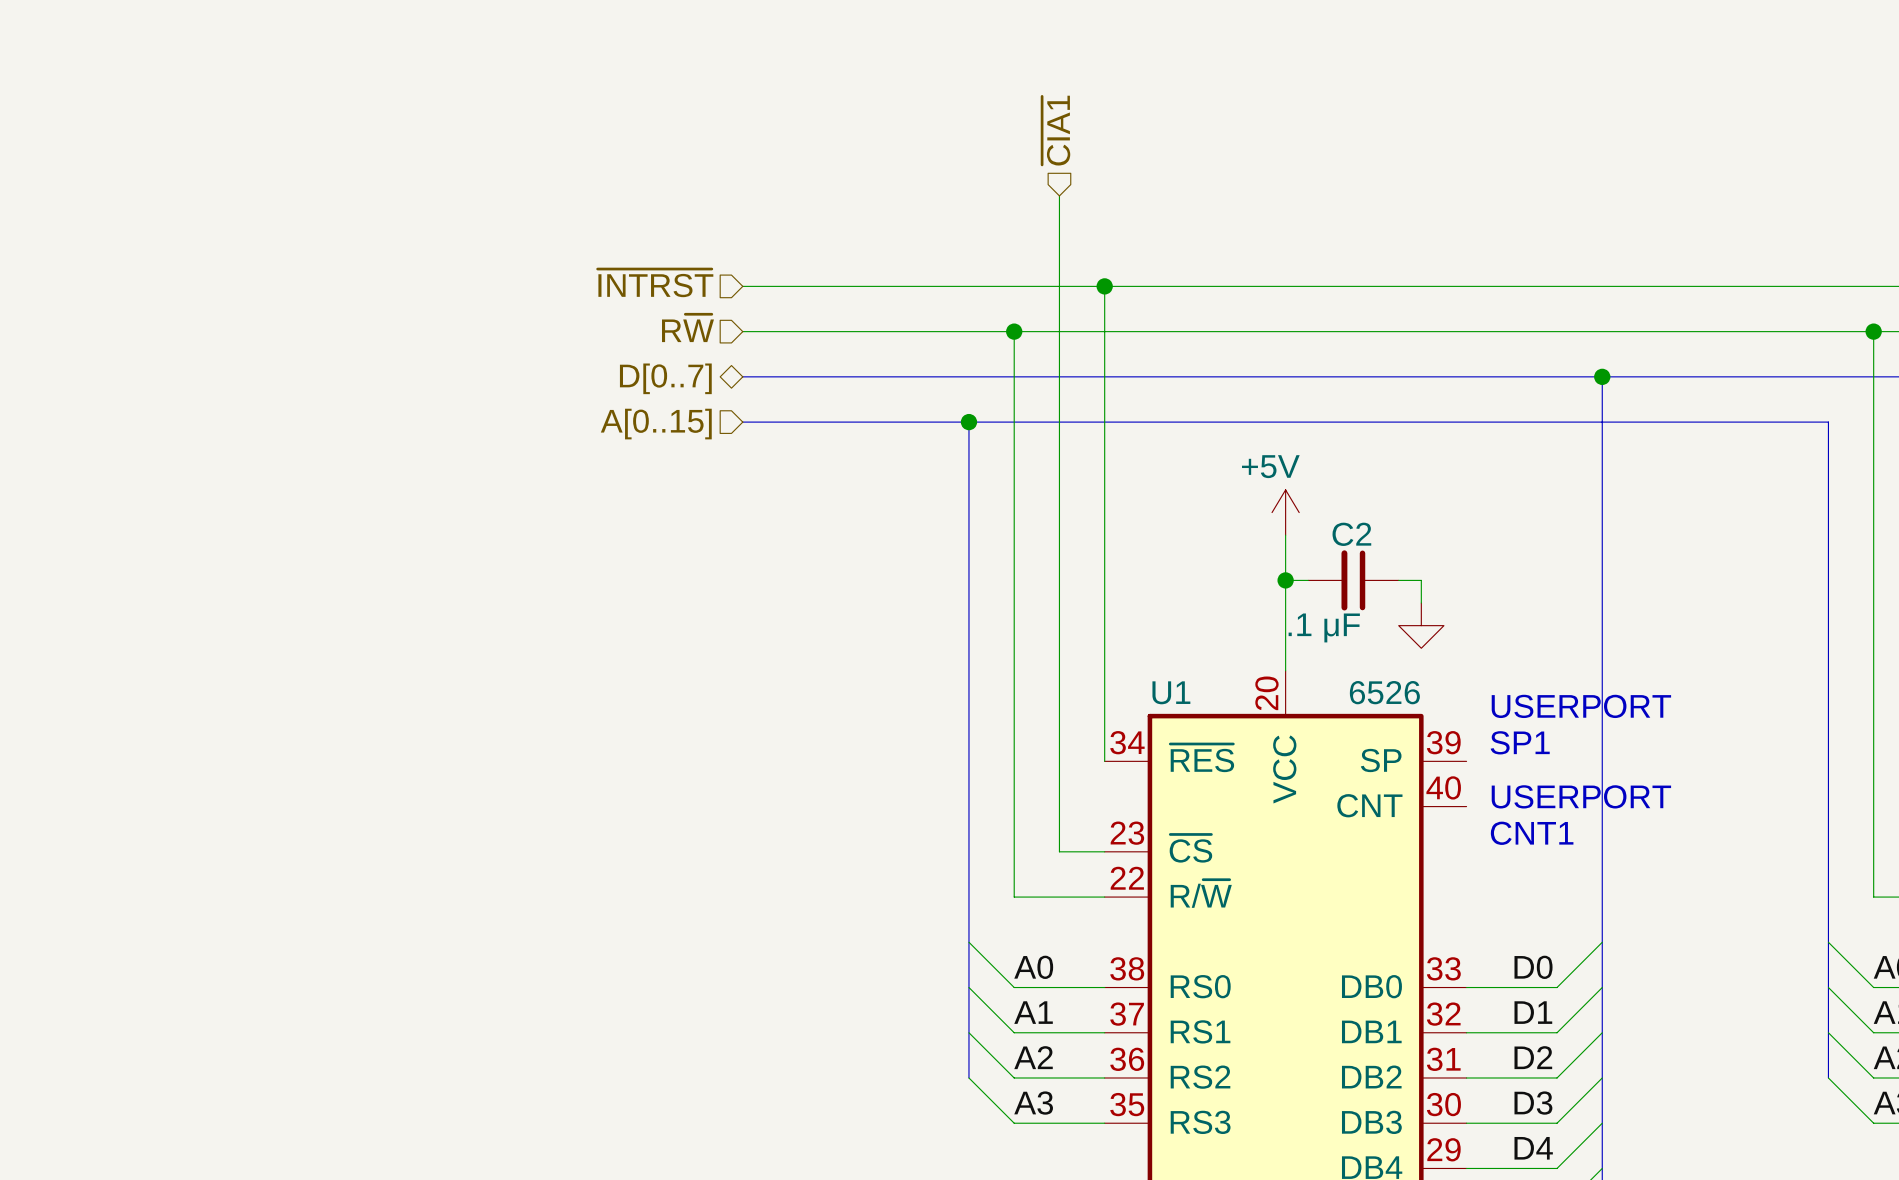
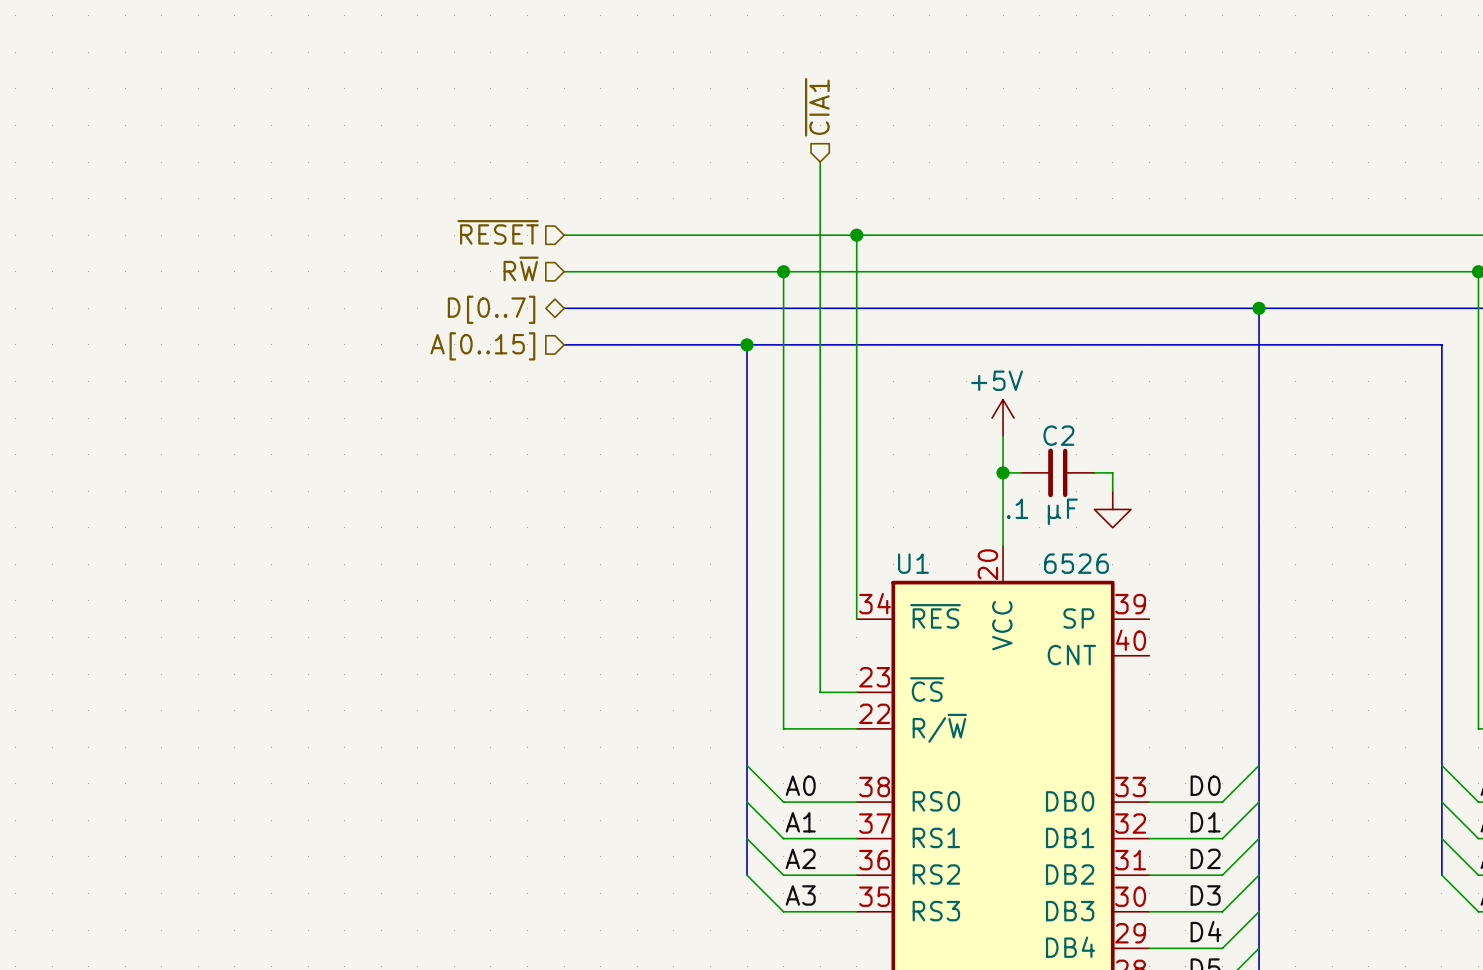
hierarchical label: ~{INTRST} (655, 283) -> ~{RESET} (498, 232)
text: USERPORT (1581, 706) -> none
text: SP1 (1520, 742) -> none
text: USERPORT (1581, 796) -> none
text: CNT1 (1532, 833) -> none

